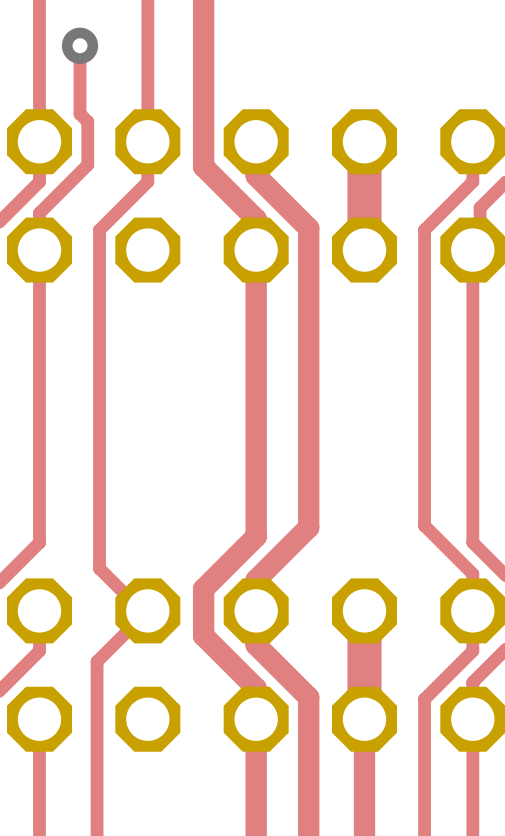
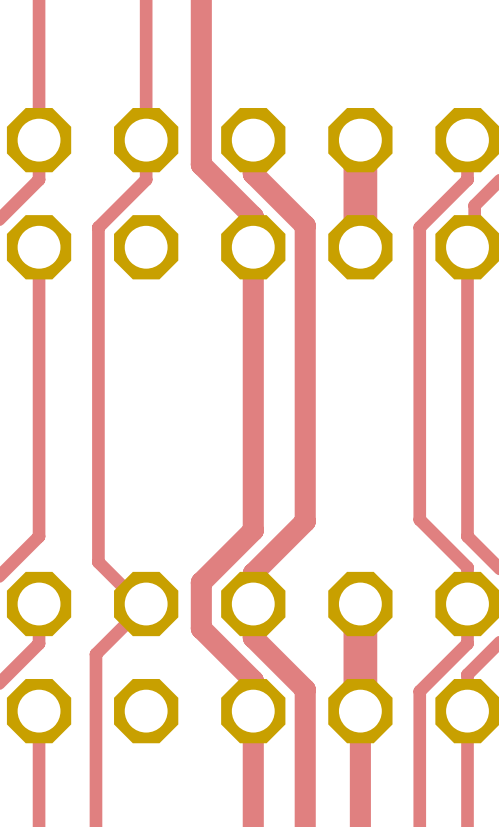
track: (80, 45) (80, 113) (87, 121) (87, 164) (39, 213) (39, 250) -> none
via: (80, 45) -> none

